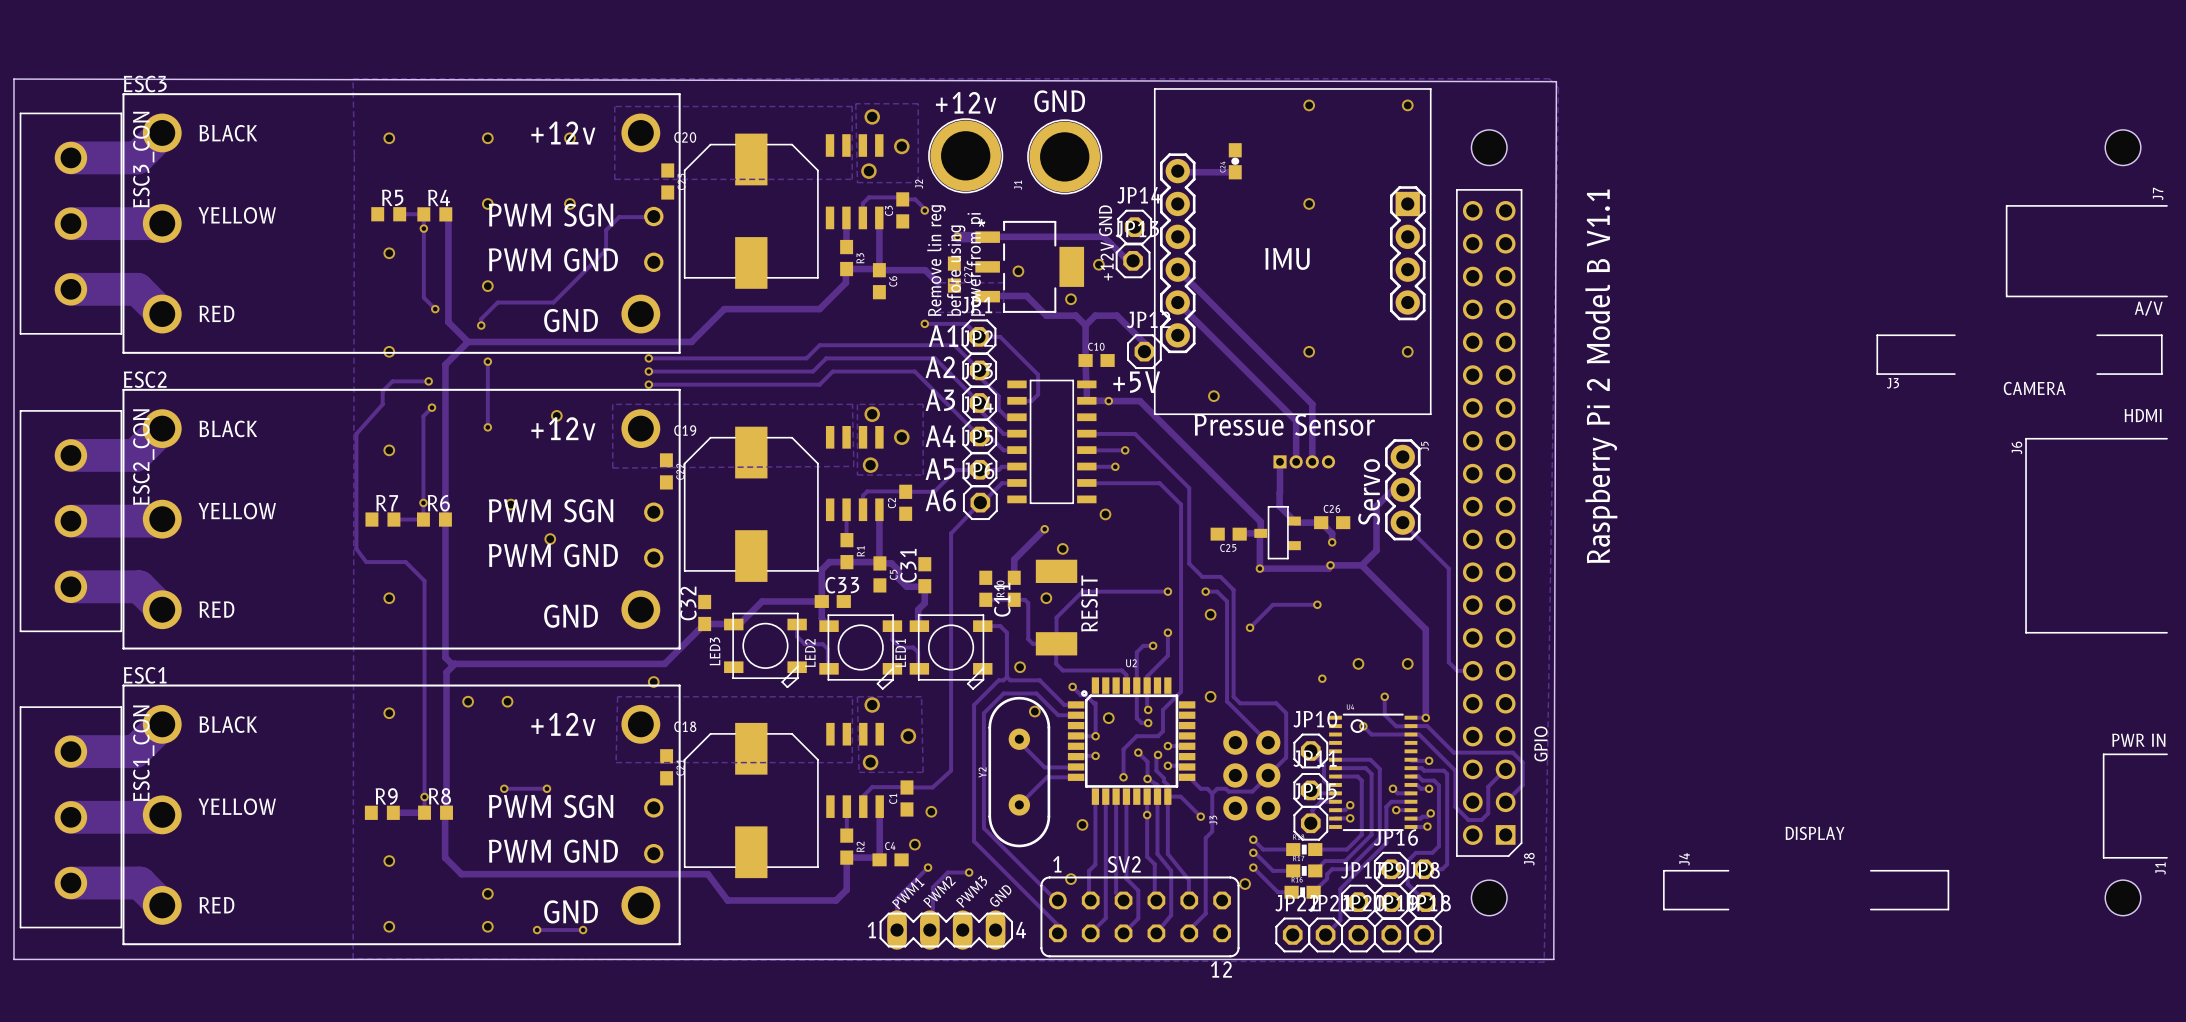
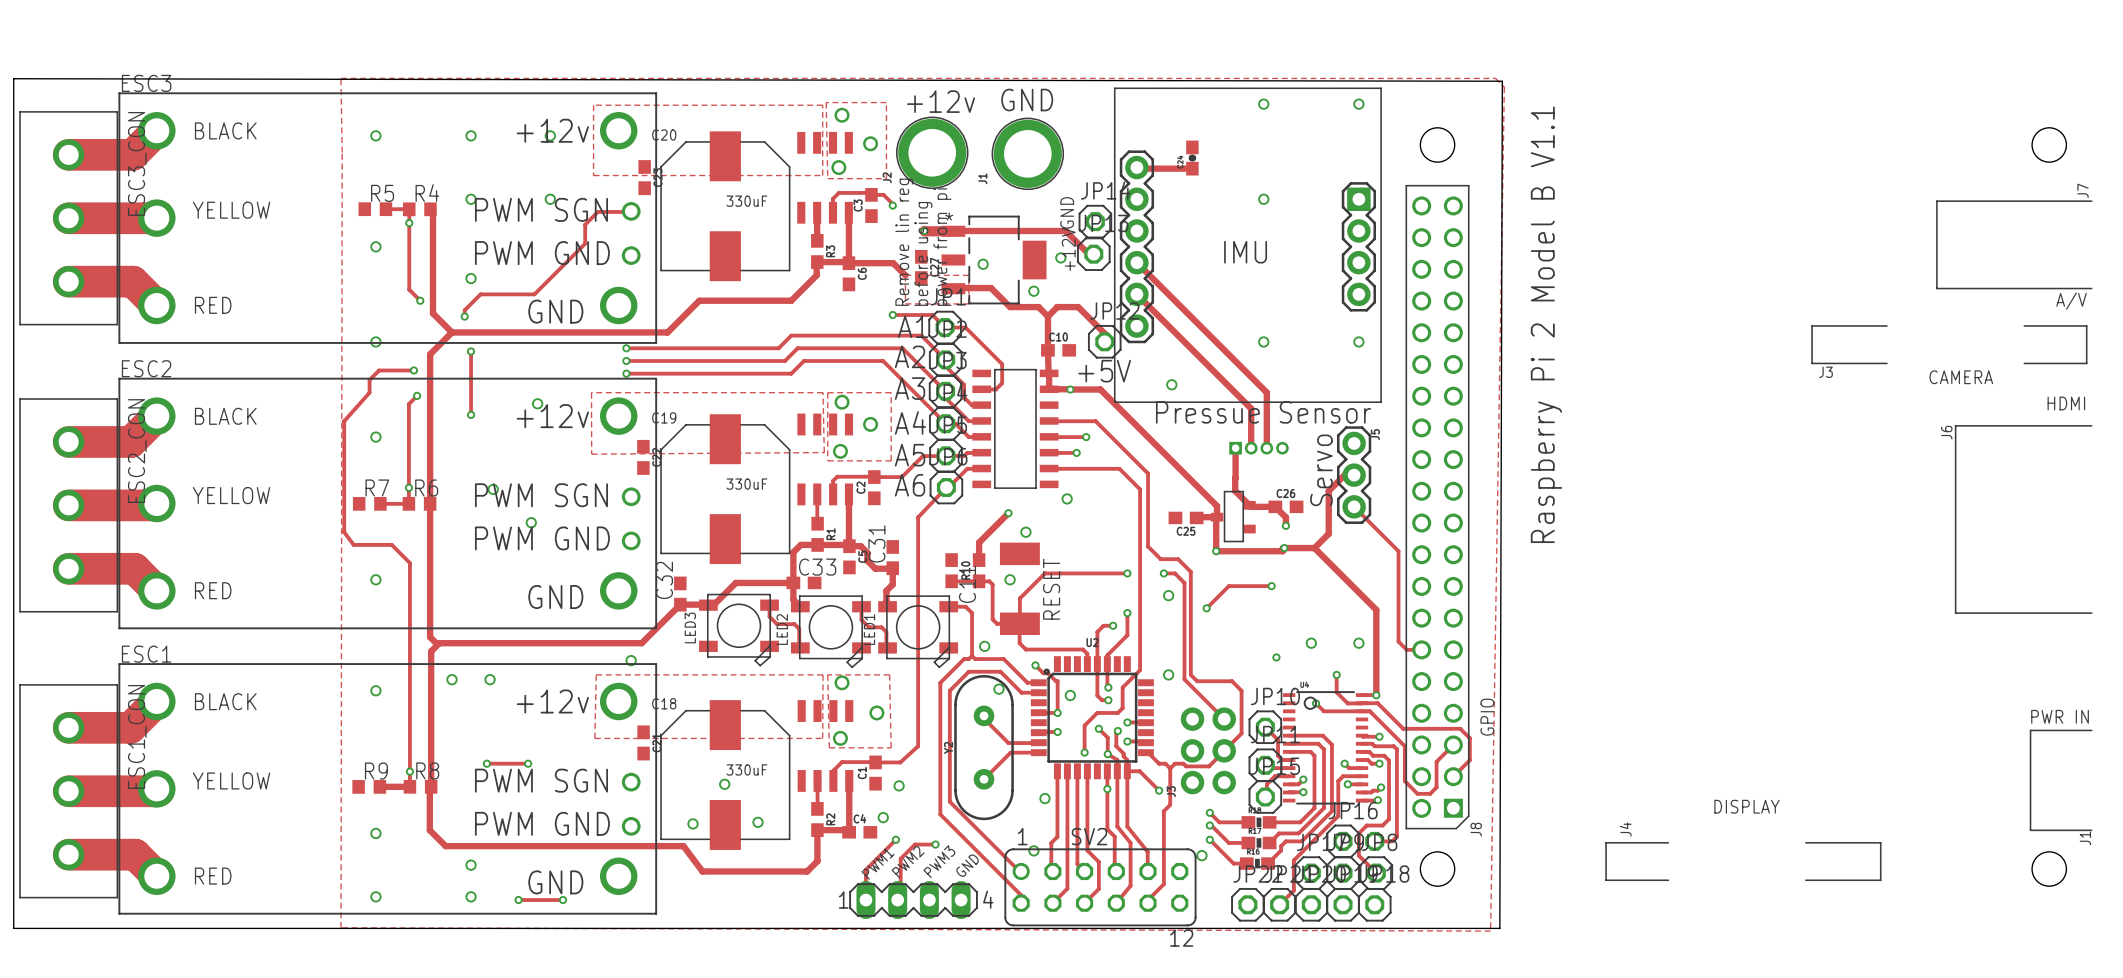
C20 value: none -> 330uF (746, 201)
C19 value: none -> 330uF (746, 484)
C18 value: none -> 330uF (746, 769)
via: none -> (724, 784)
via: none -> (758, 822)
via: none -> (693, 823)

